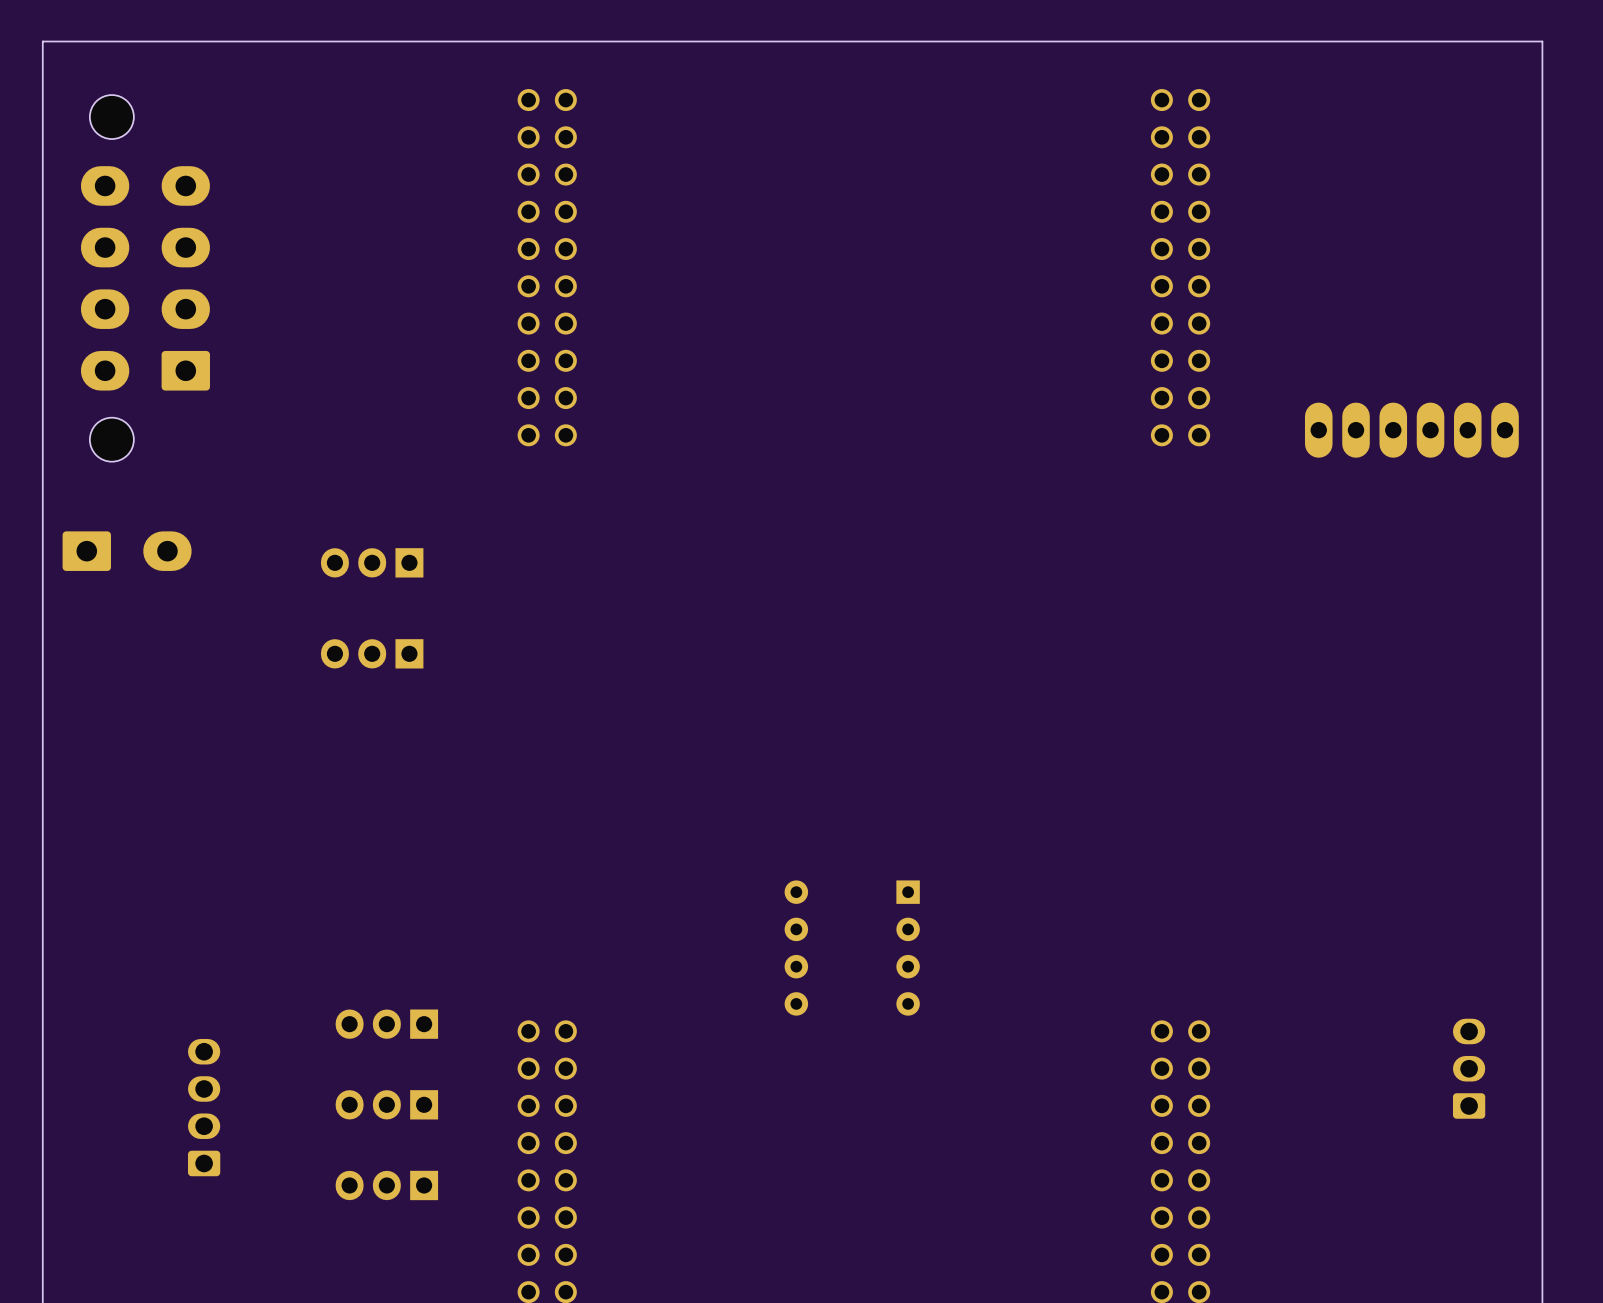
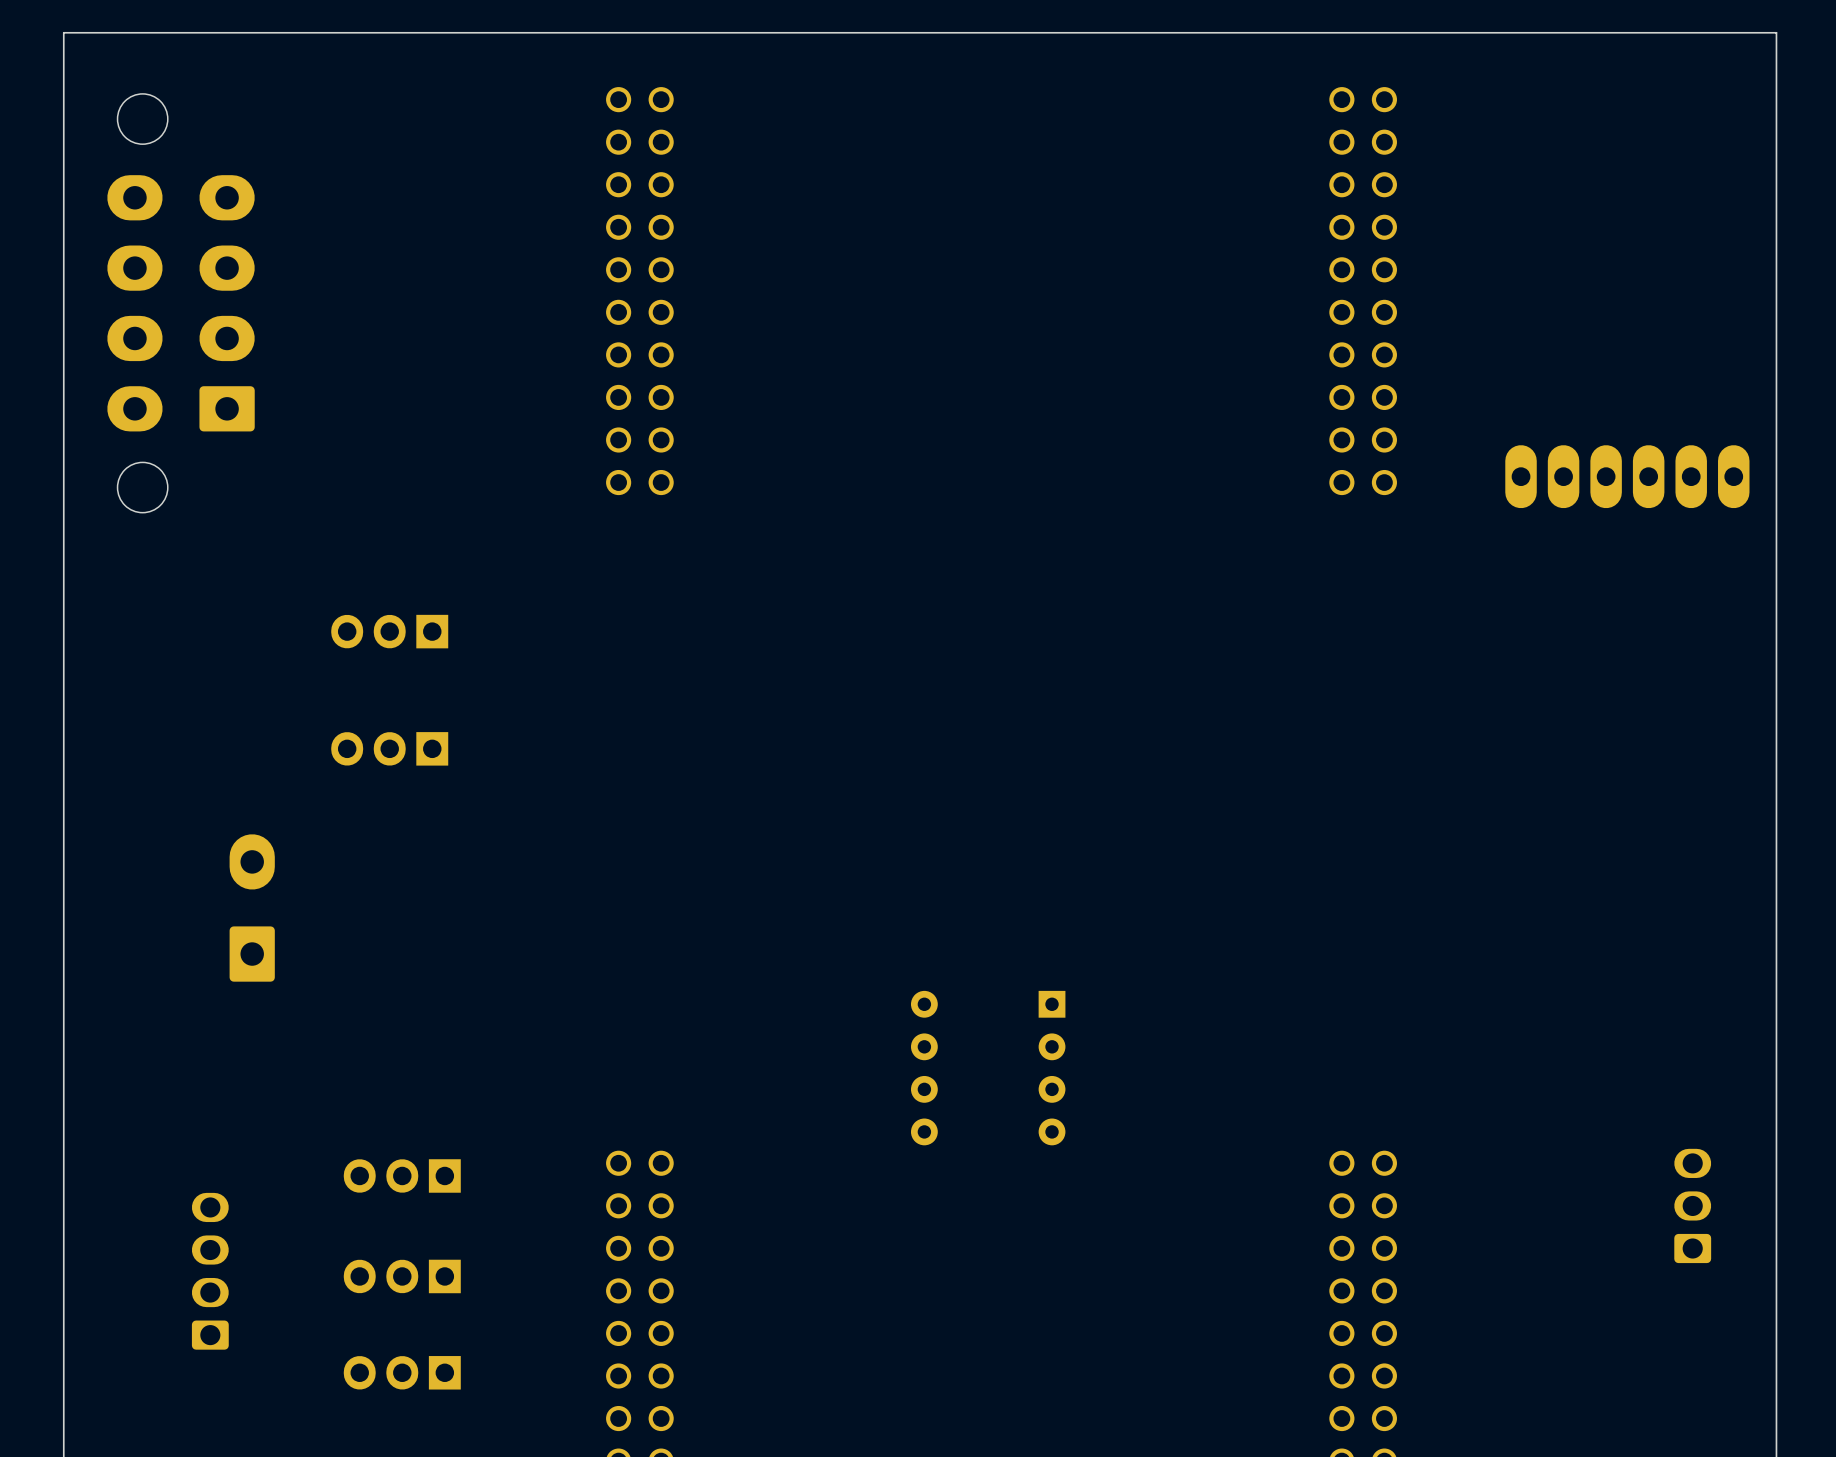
part rotation: 0° (127, 551) -> 90° counterclockwise (252, 907)
part position: (127, 551) -> (252, 907)
part position: (372, 562) -> (389, 631)
part position: (372, 653) -> (389, 748)
part: (386, 1024) -> none
part: none -> (402, 1175)
part: (386, 1104) -> none
part position: (204, 1107) -> (210, 1271)
part: none -> (402, 1276)
part: (386, 1185) -> none
part: none -> (402, 1372)

